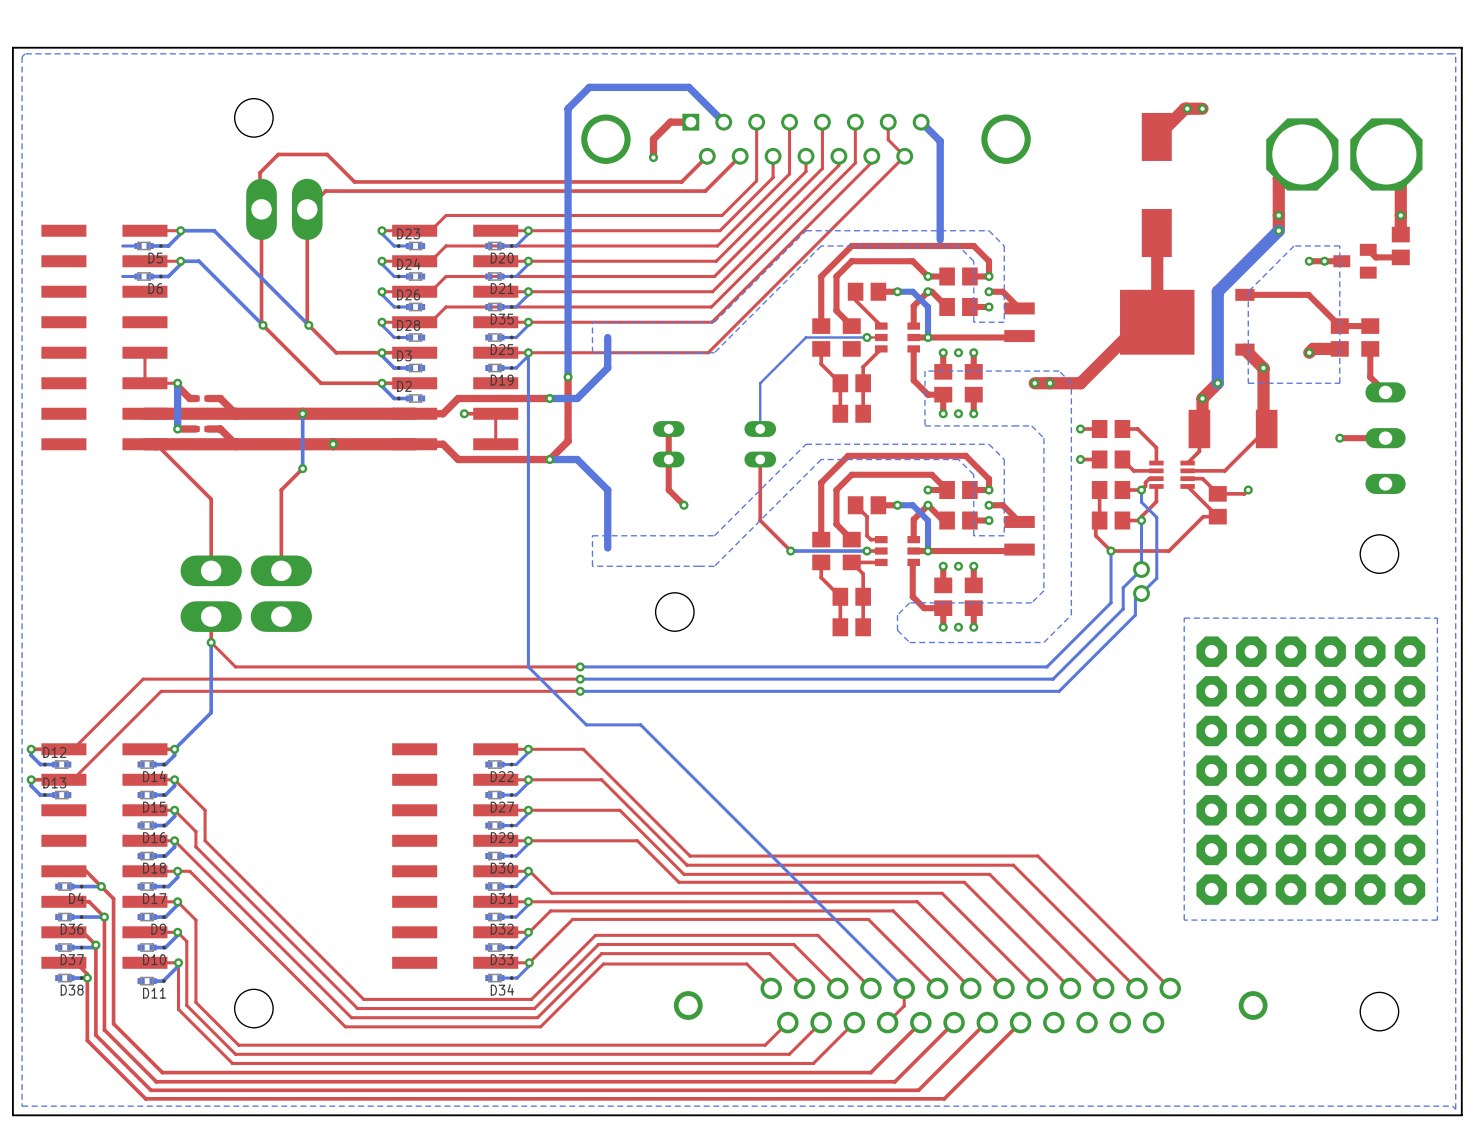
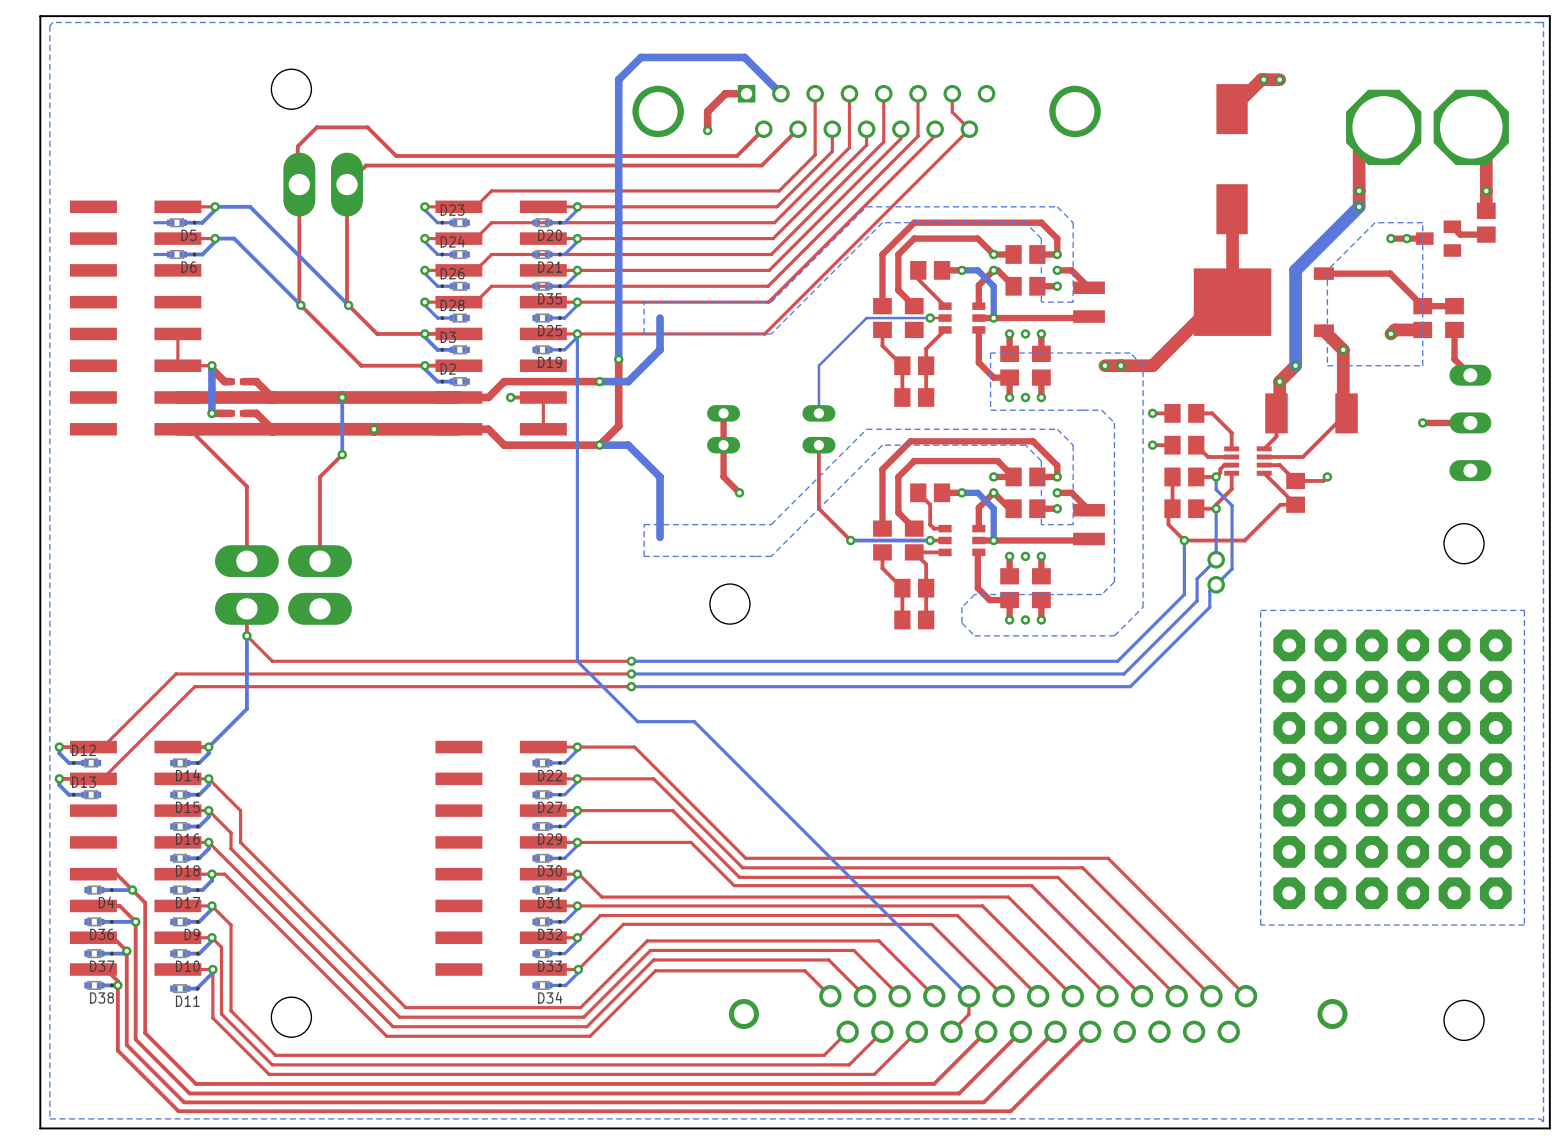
bottom track: (921, 122) (940, 141) (940, 239) -> none

